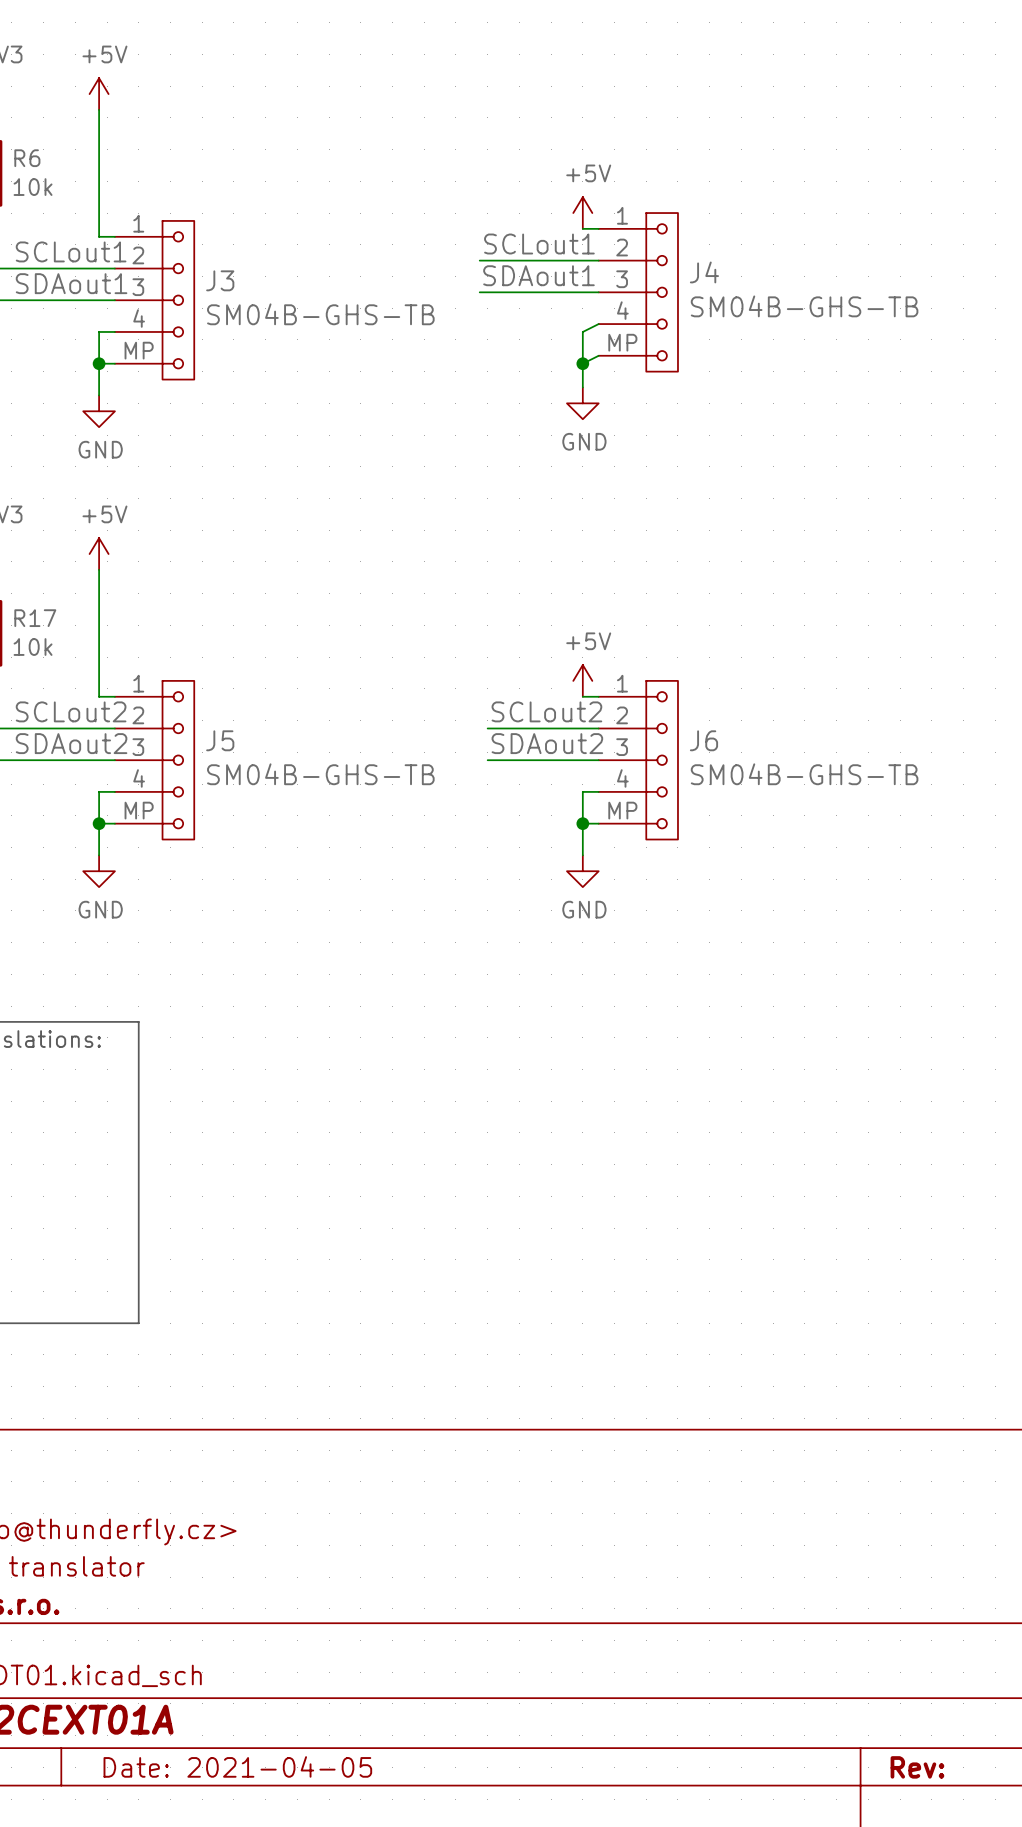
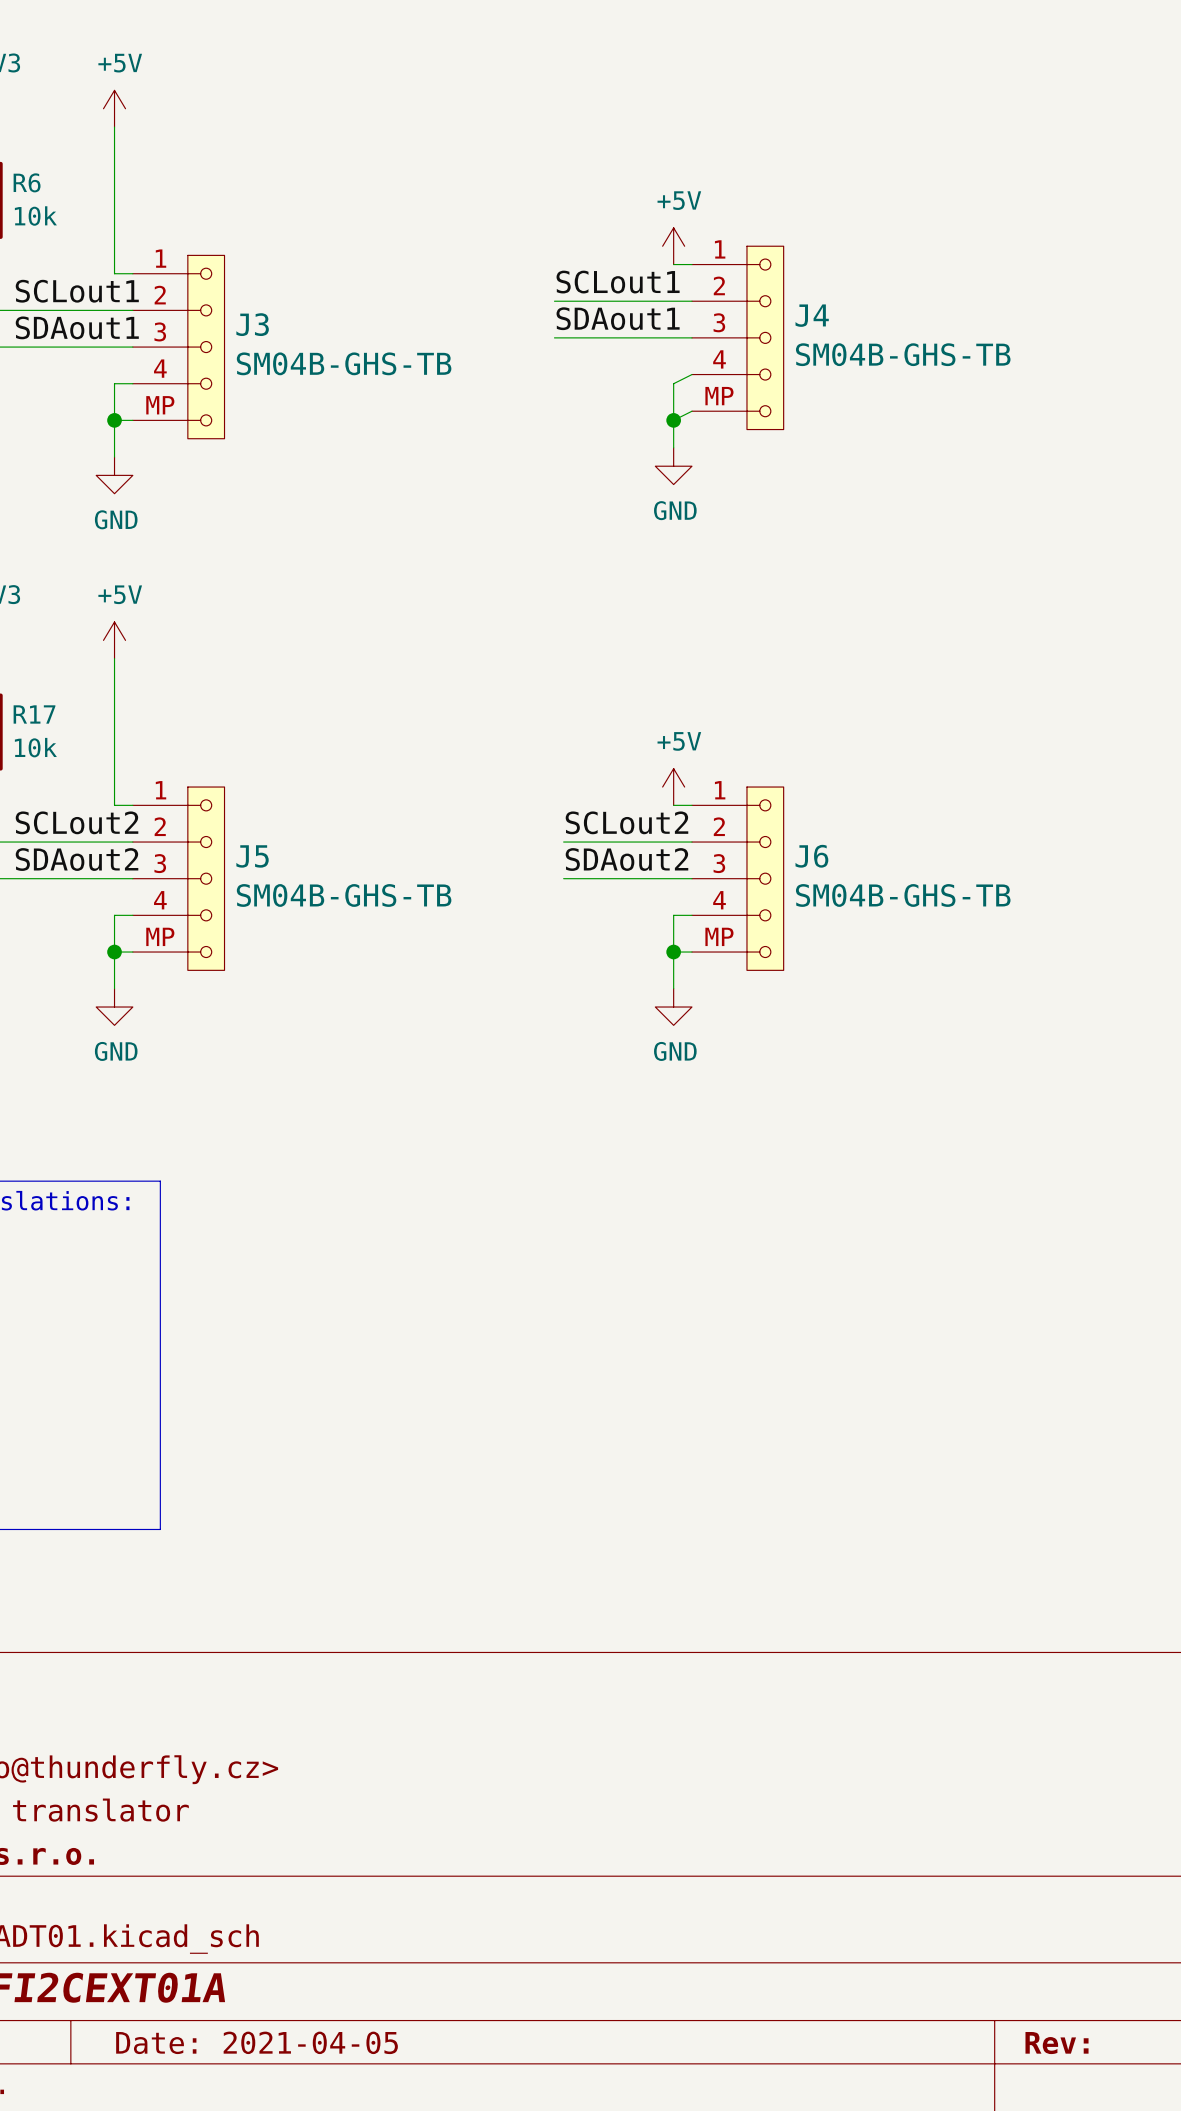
label position: SCLout1 (539, 244) -> SCLout1 (618, 282)
label position: SDAout1 (538, 275) -> SDAout1 (618, 318)

